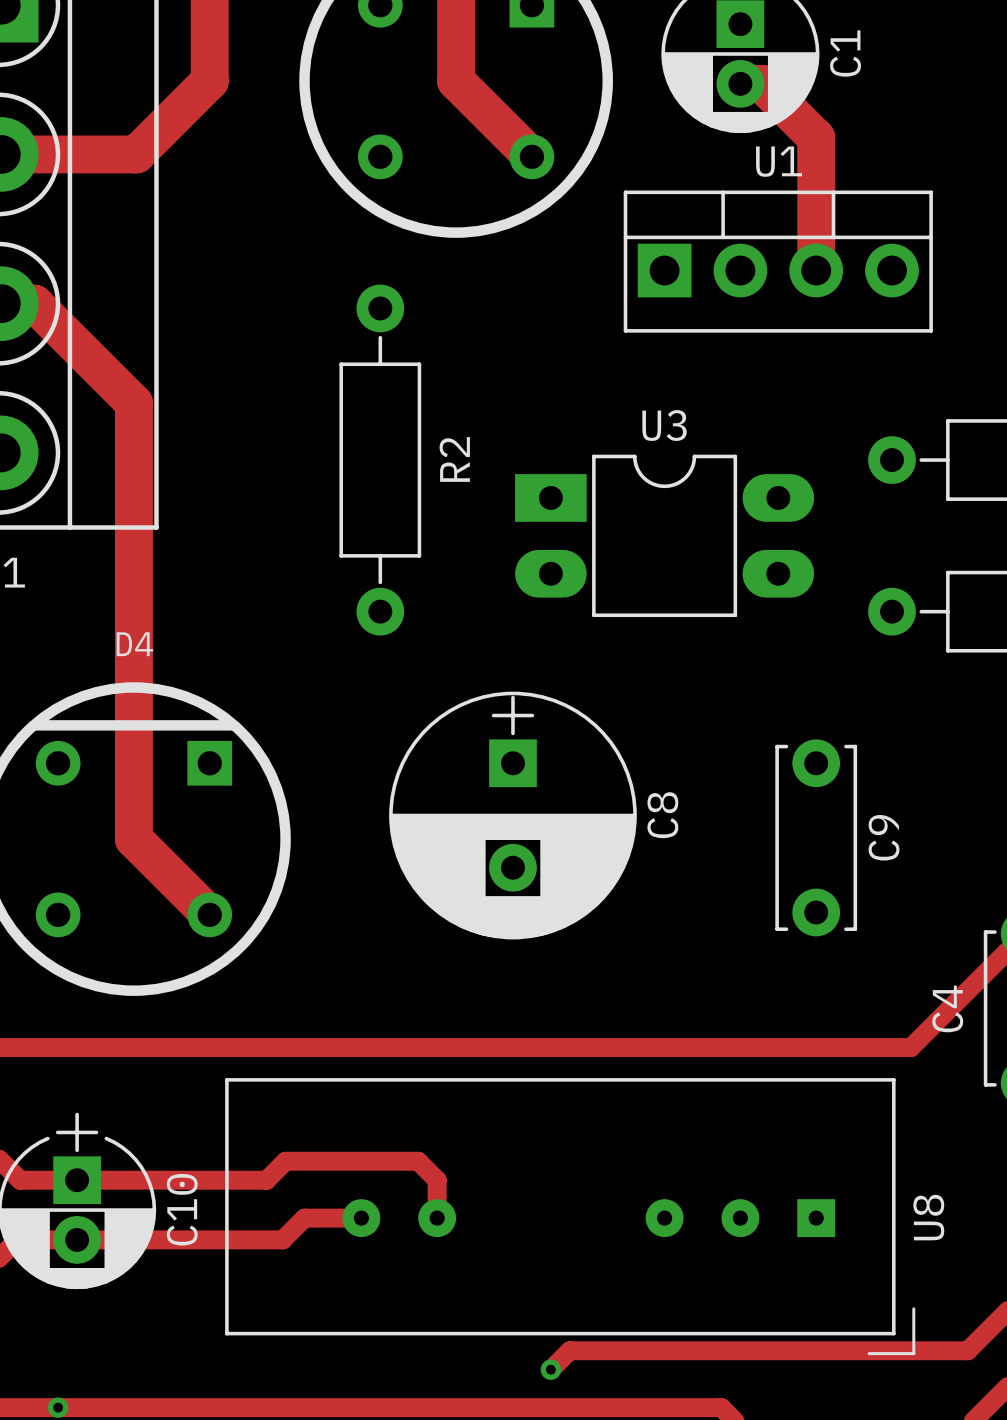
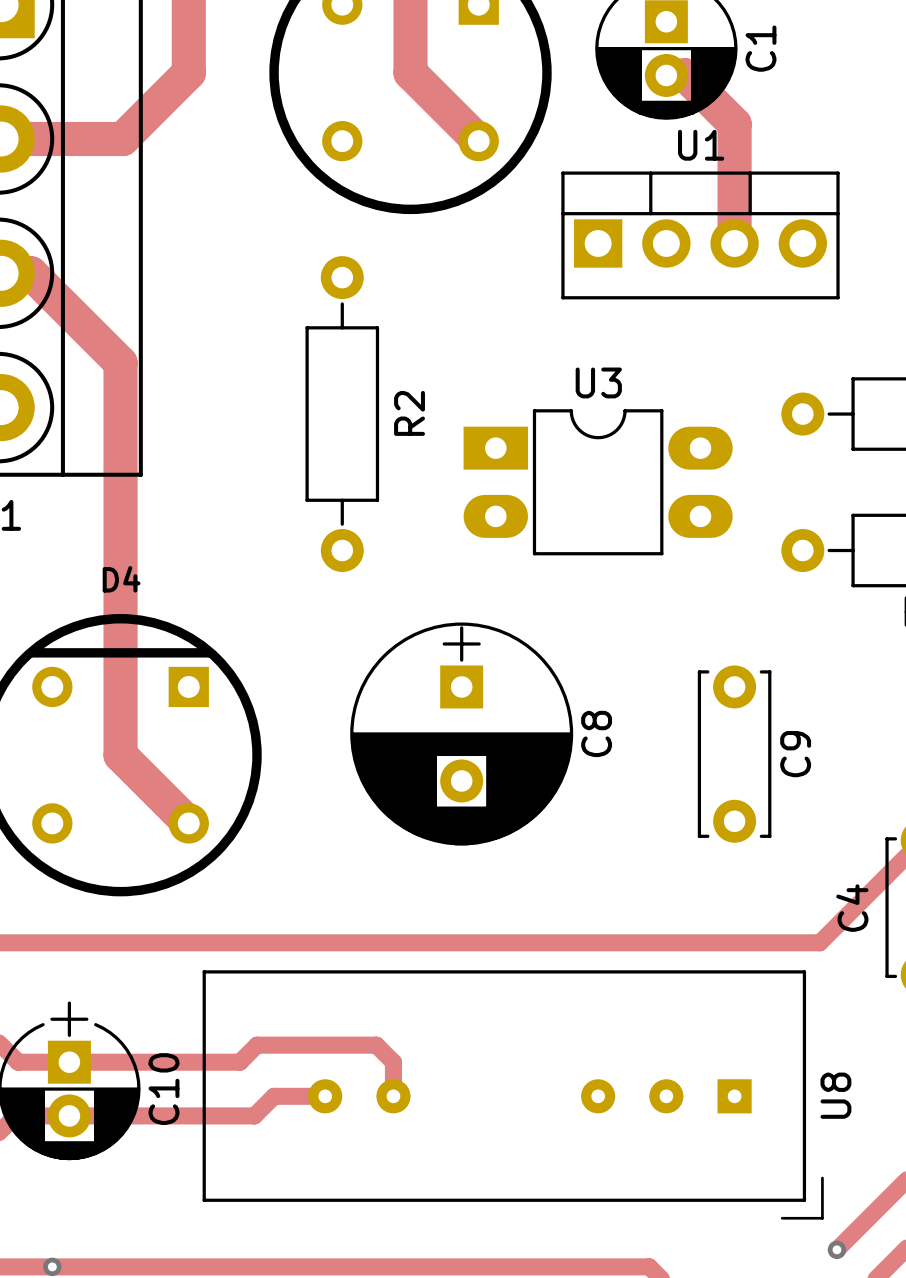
track: (967, 1350) (569, 1350) (550, 1369) -> (871, 1215) (836, 1249)
via: (550, 1369) -> none
via: none -> (836, 1249)

